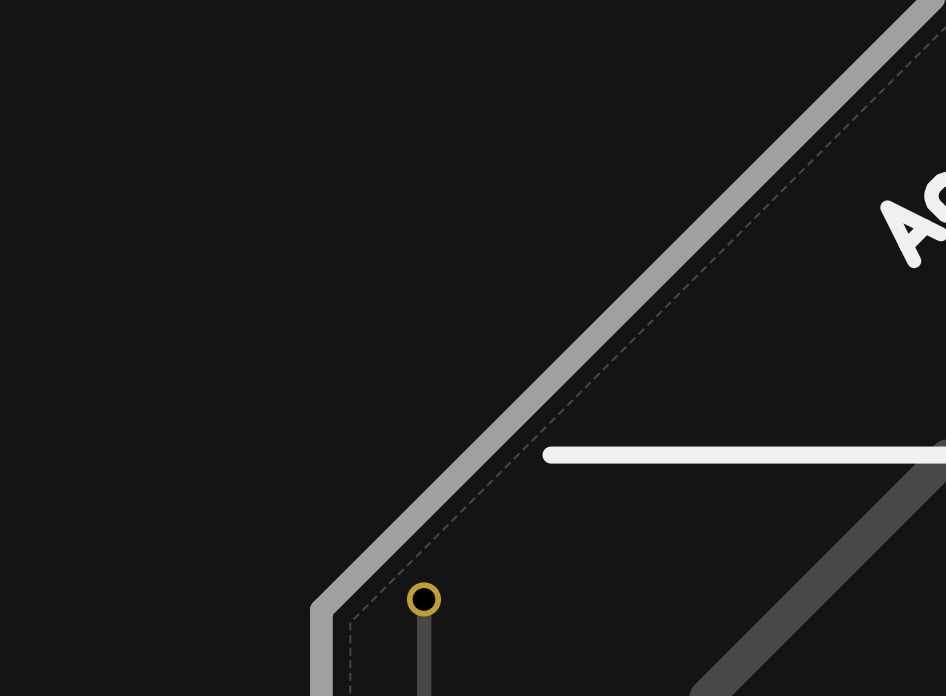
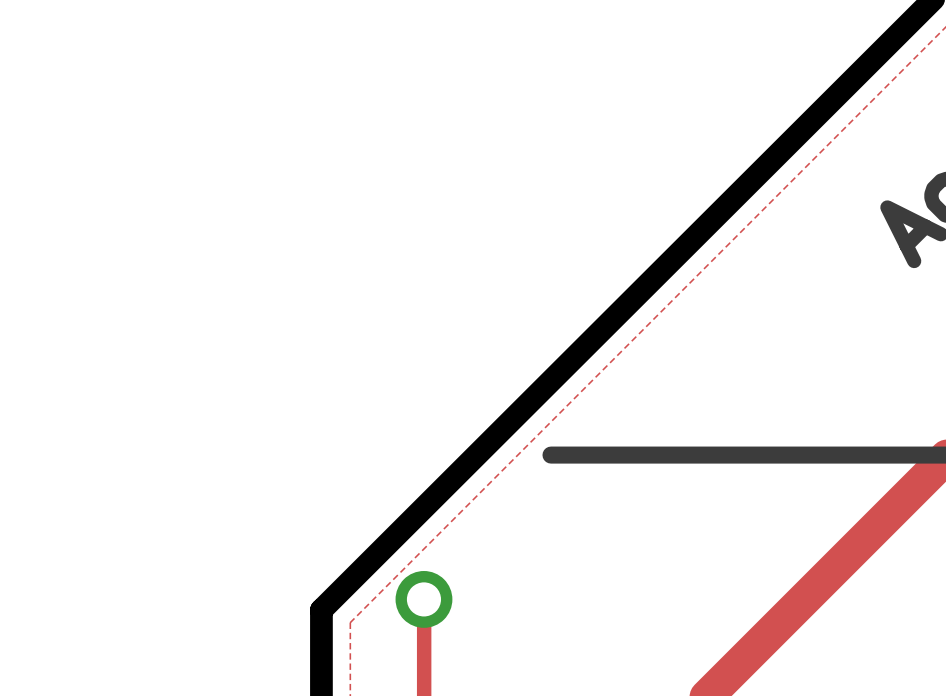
via size: [406, 582, 442, 617] -> [395, 571, 453, 628]

